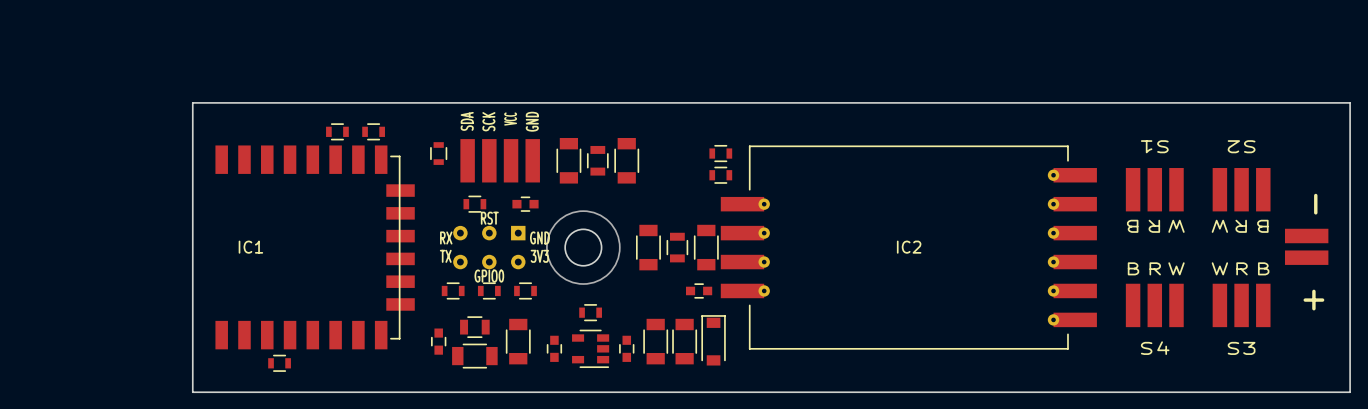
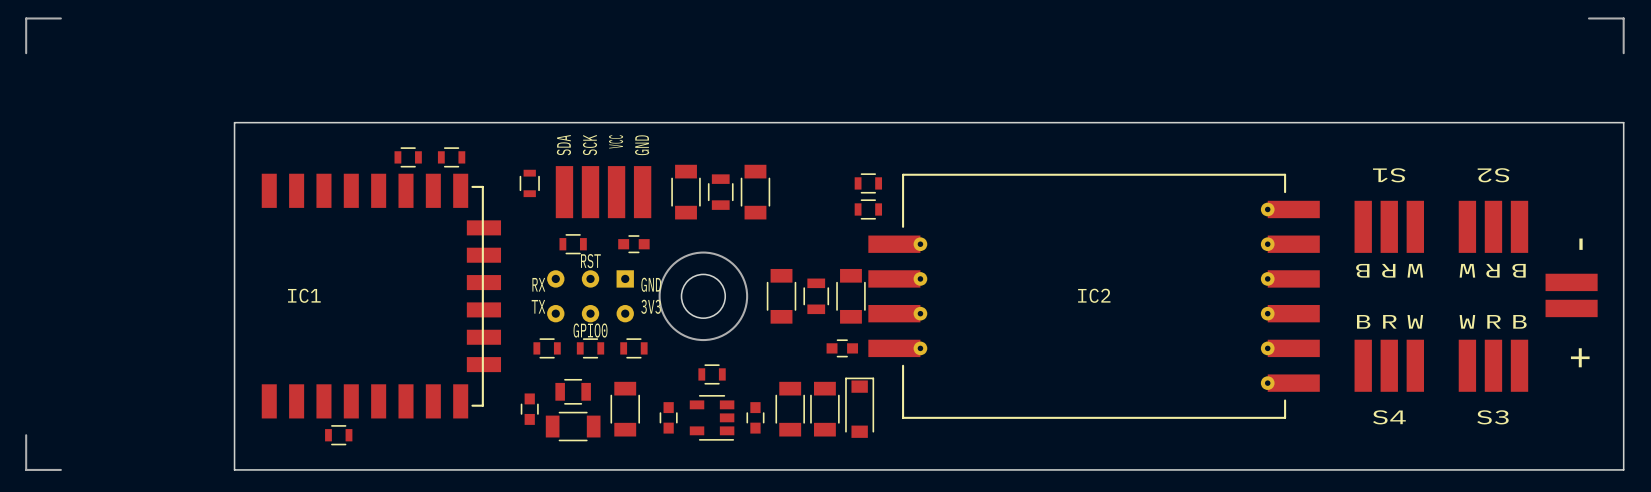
line: none -> (60, 18) (26, 18) (26, 53)
line: none -> (1588, 18) (1623, 18) (1623, 53)
line: none -> (26, 435) (26, 469) (60, 469)

